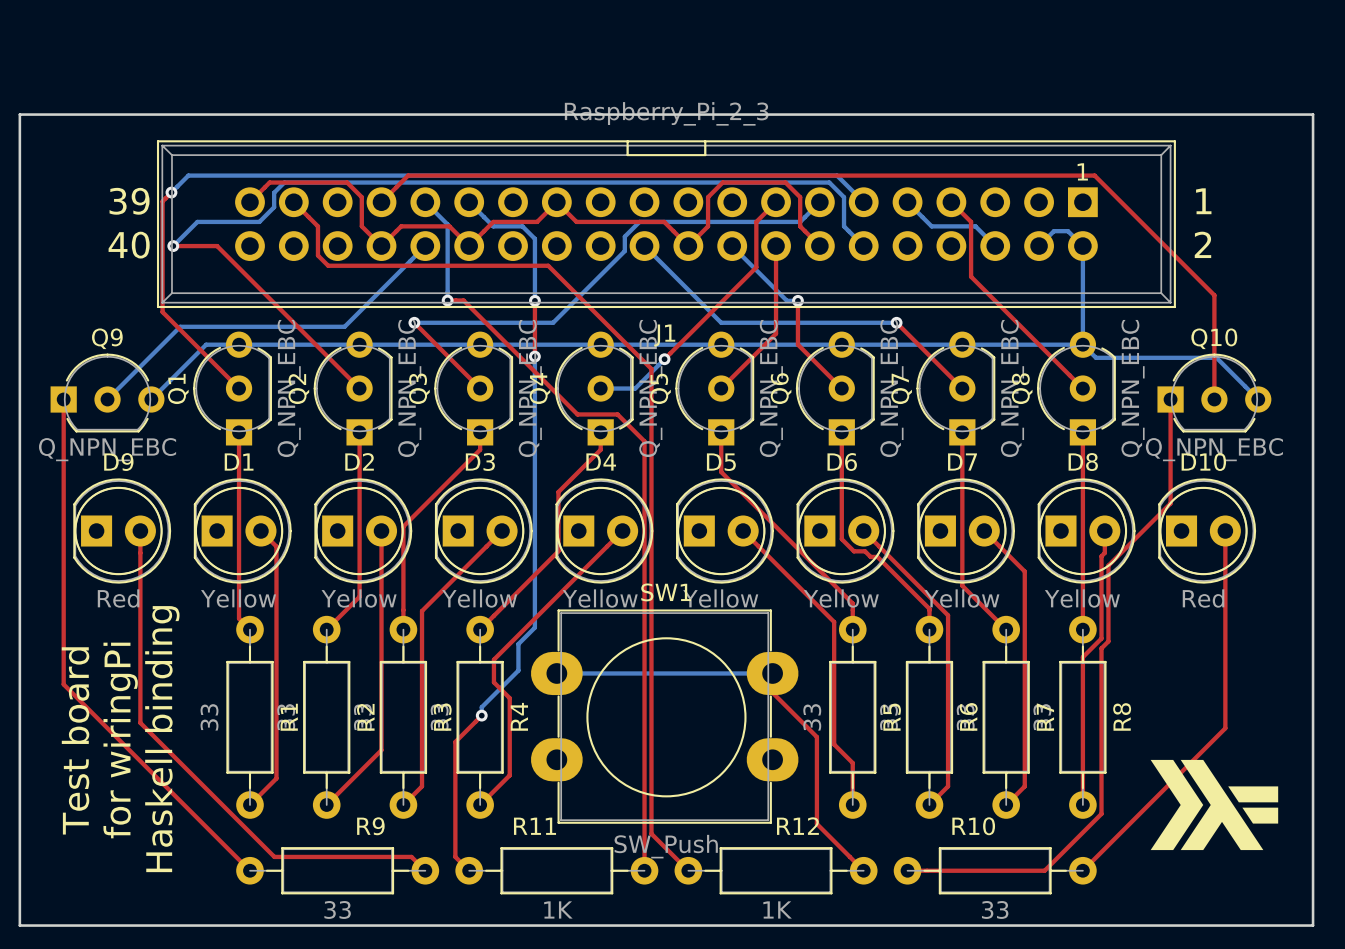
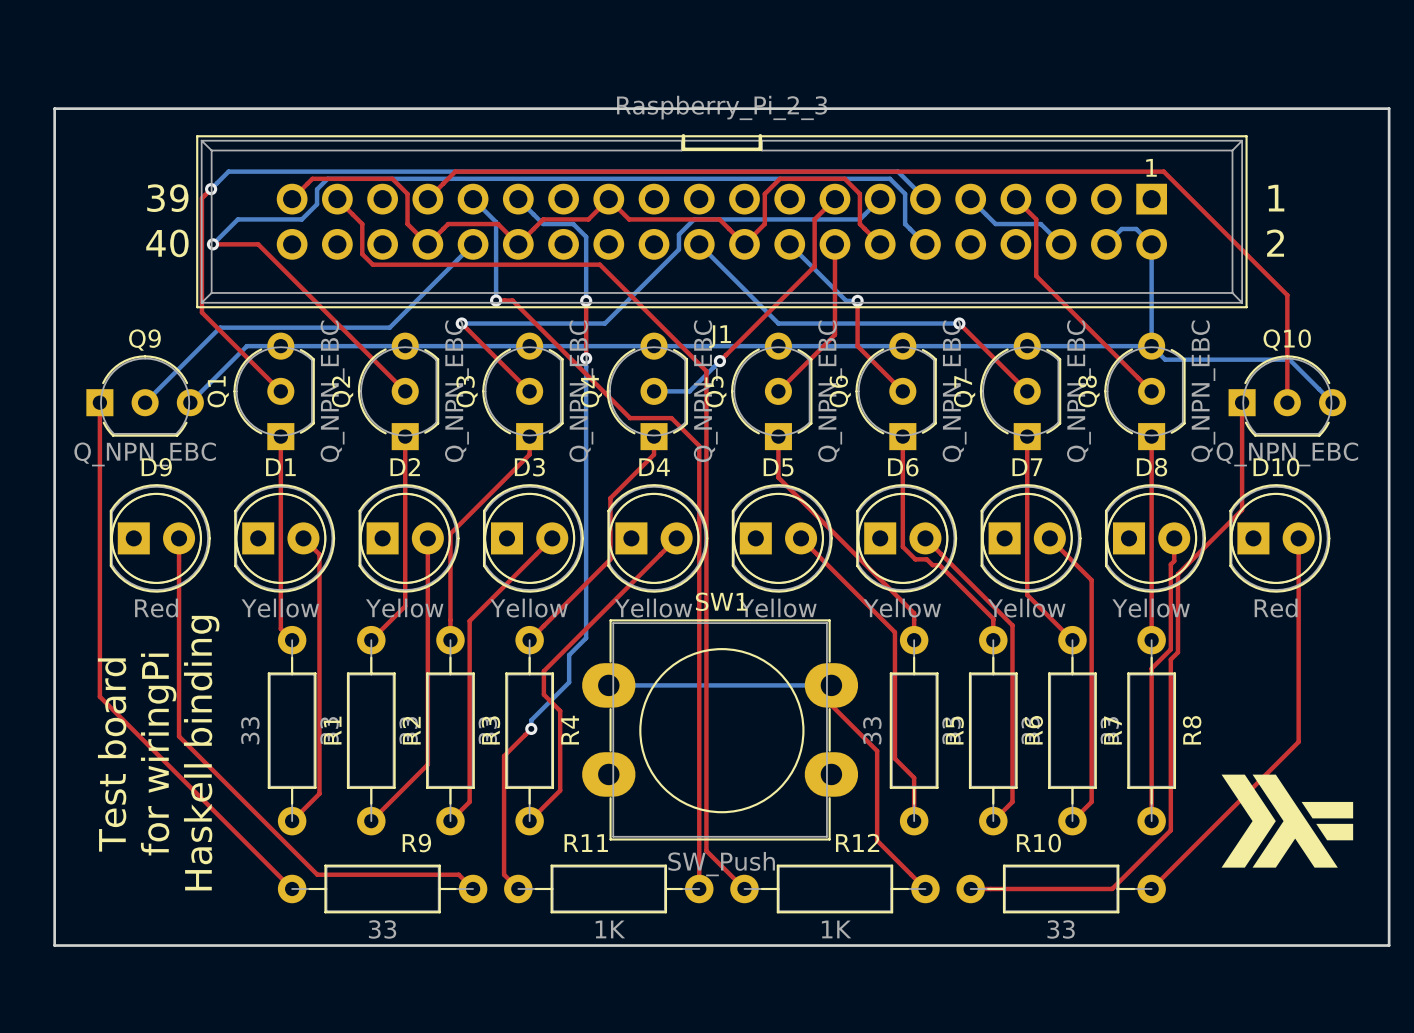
J1 footprint: [156, 140, 1176, 309] -> [196, 135, 1248, 309]
line: none -> (683, 135) (683, 149) (760, 149) (760, 135)

